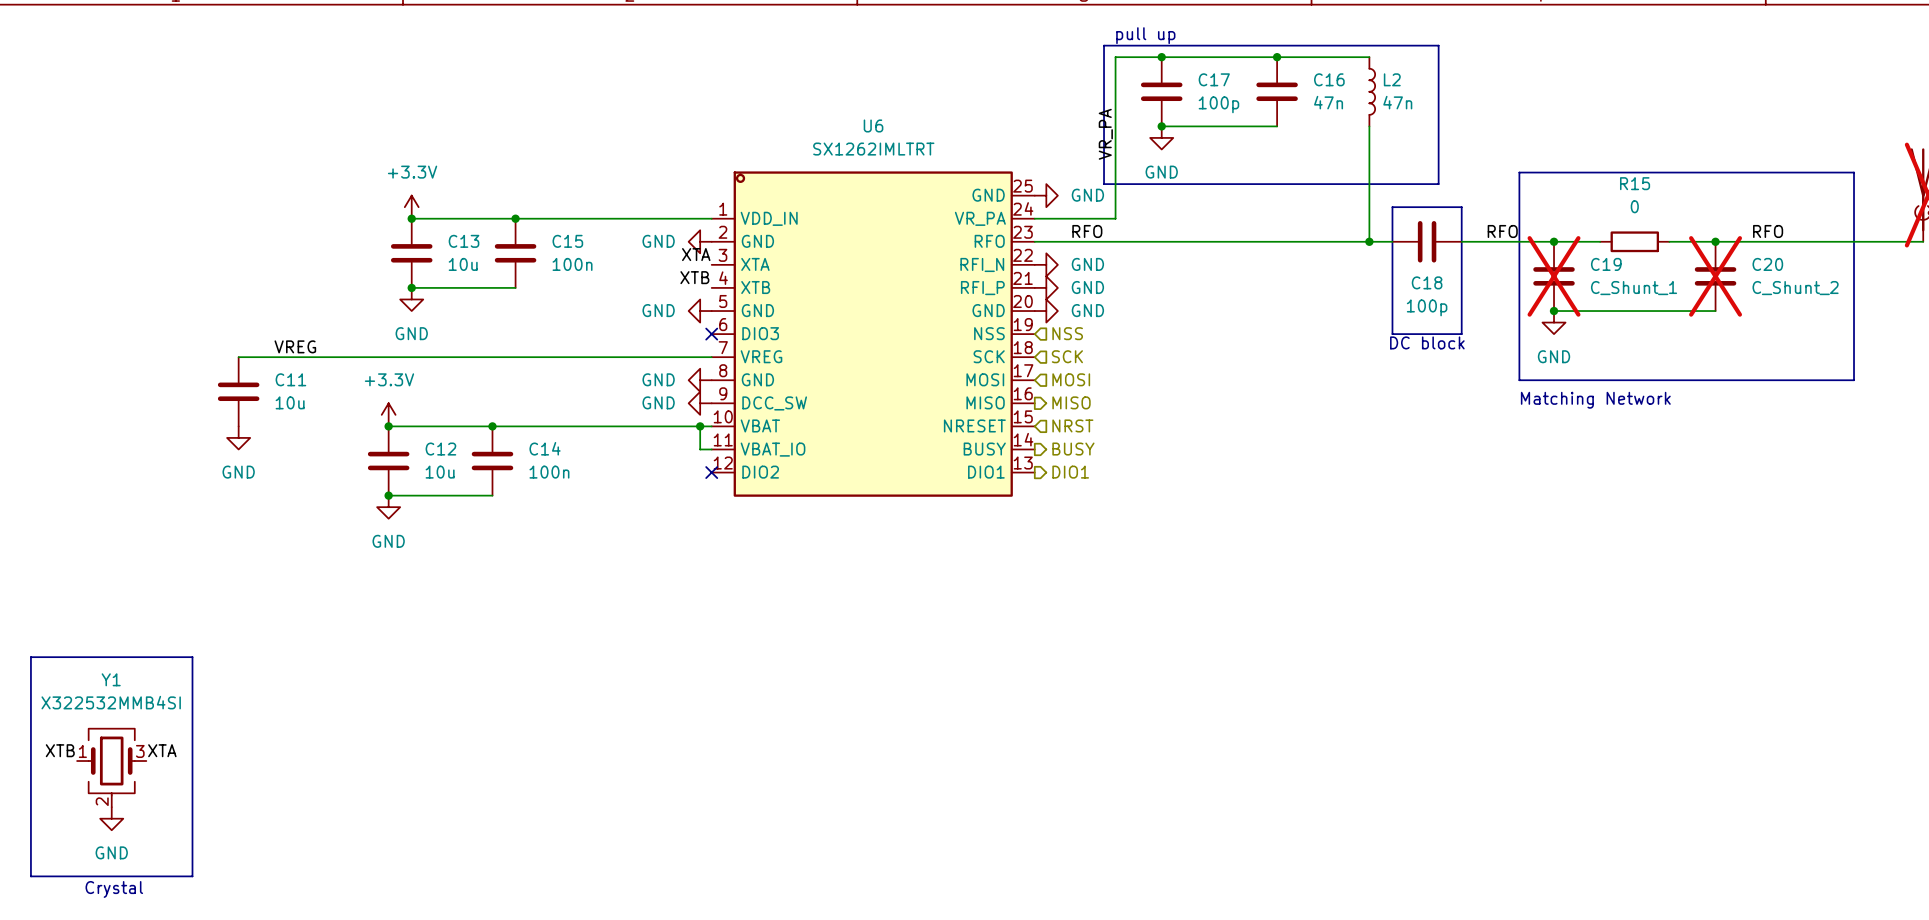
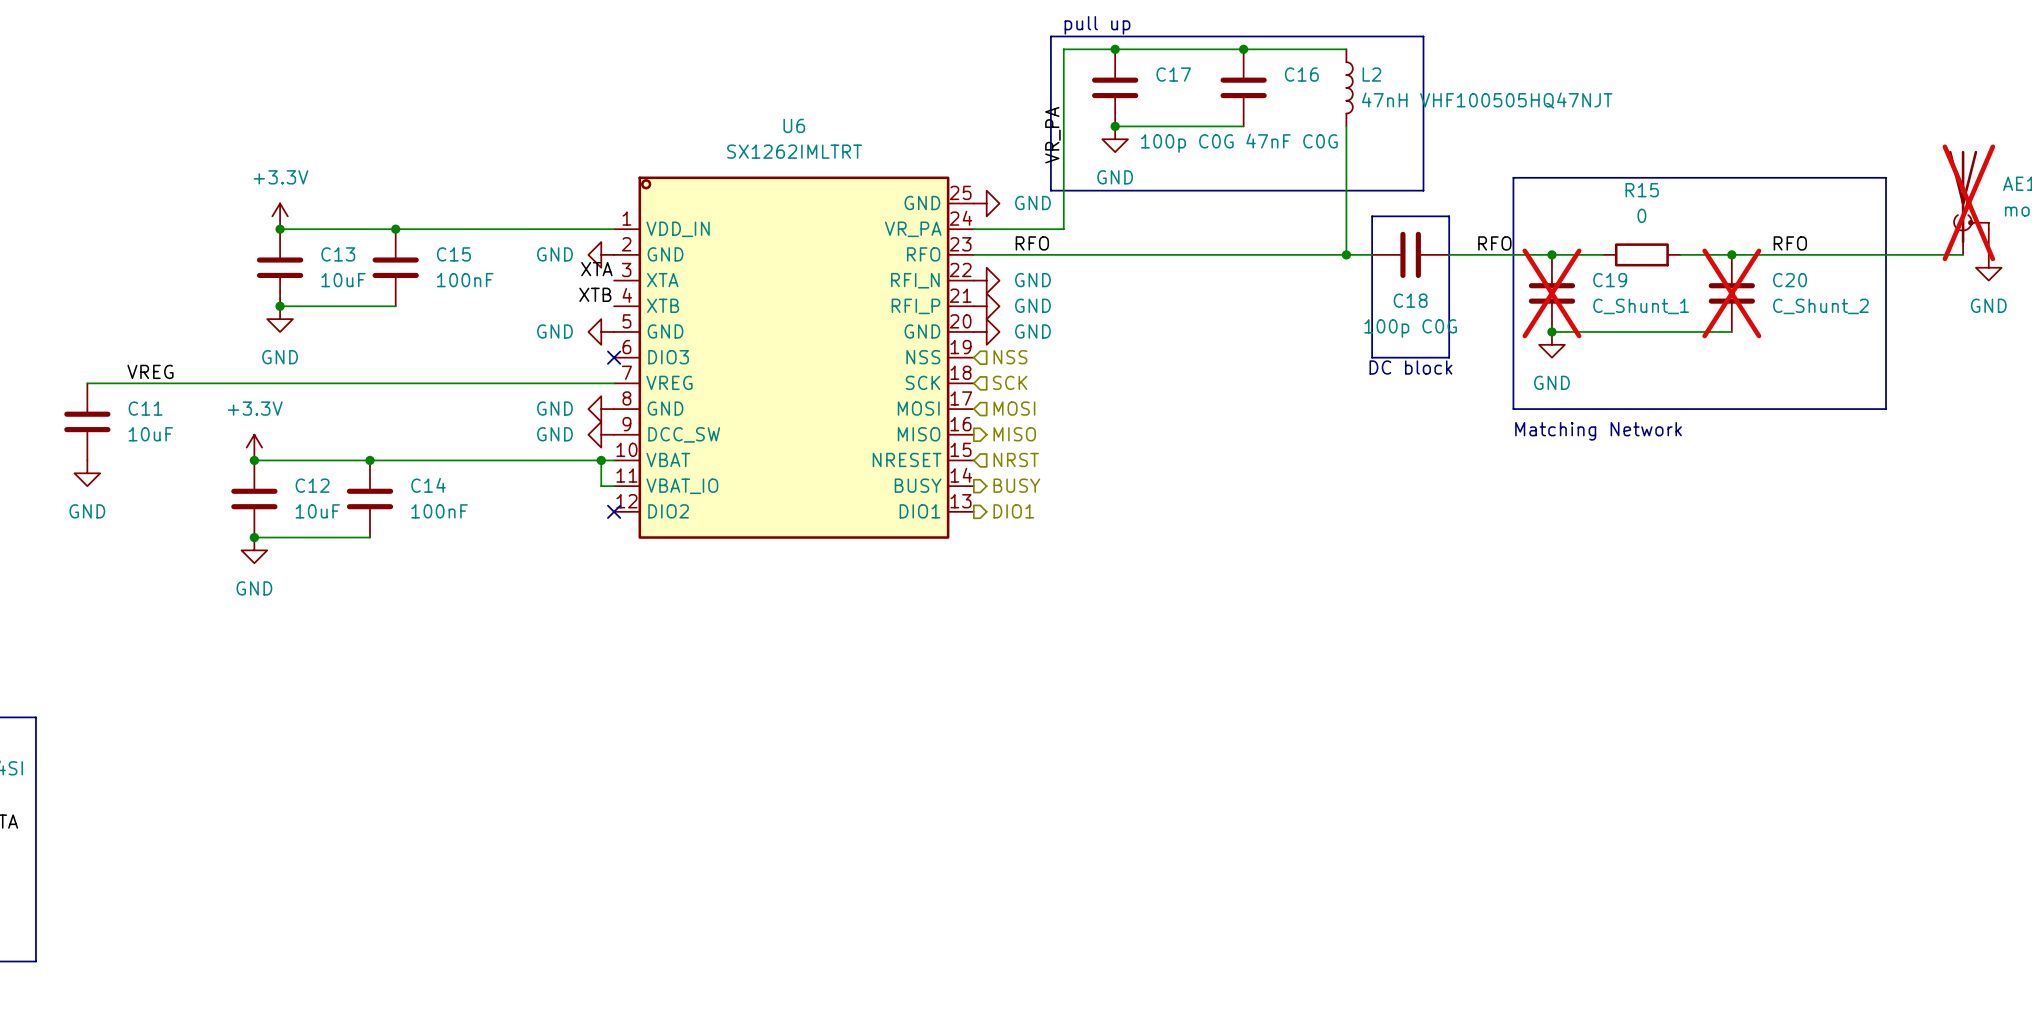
C16 value: 47n (1328, 102) -> 47nF C0G (1292, 141)
L2 value: 47n (1397, 102) -> 47nH VHF100505HQ47NJT (1487, 100)
C17 value: 100p (1218, 104) -> 100p C0G (1187, 143)
C13 value: 10u (463, 264) -> 10uF (343, 280)
C15 value: 100n (572, 264) -> 100nF (465, 280)
C18 value: 100p (1427, 307) -> 100p C0G (1410, 328)
C11 value: 10u (290, 402) -> 10uF (150, 434)
C12 value: 10u (440, 472) -> 10uF (317, 511)
C14 value: 100n (549, 472) -> 100nF (439, 511)

